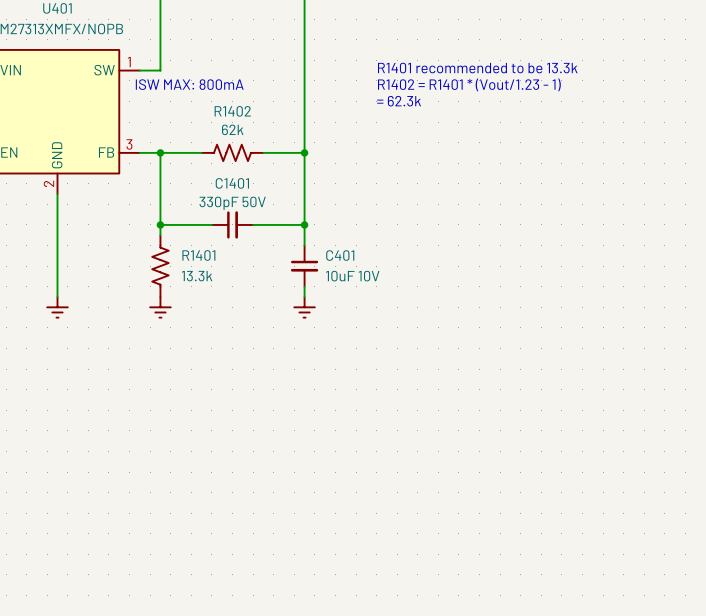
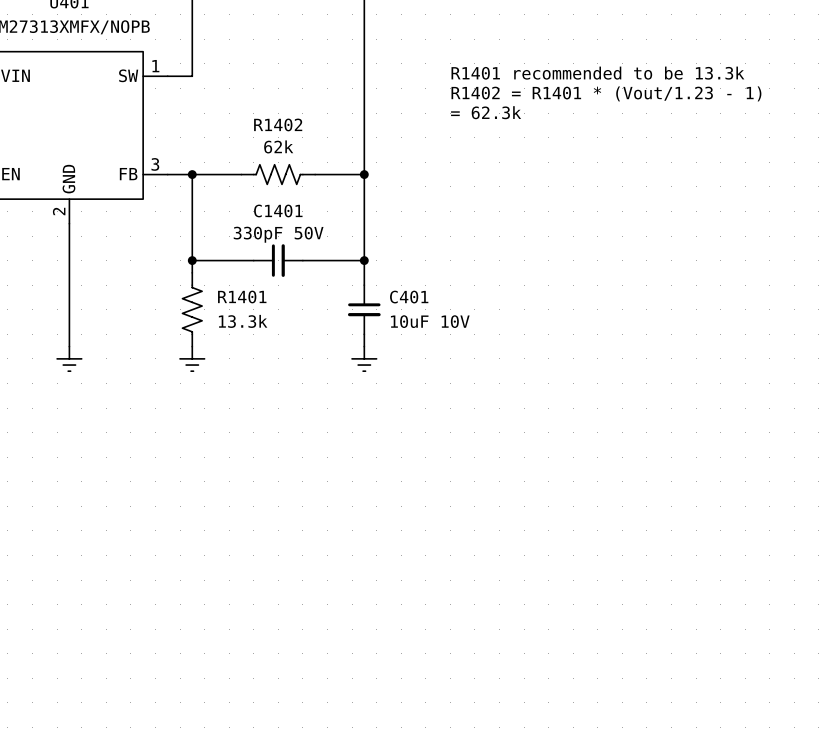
text: ISW MAX: 800mA (189, 84) -> none

